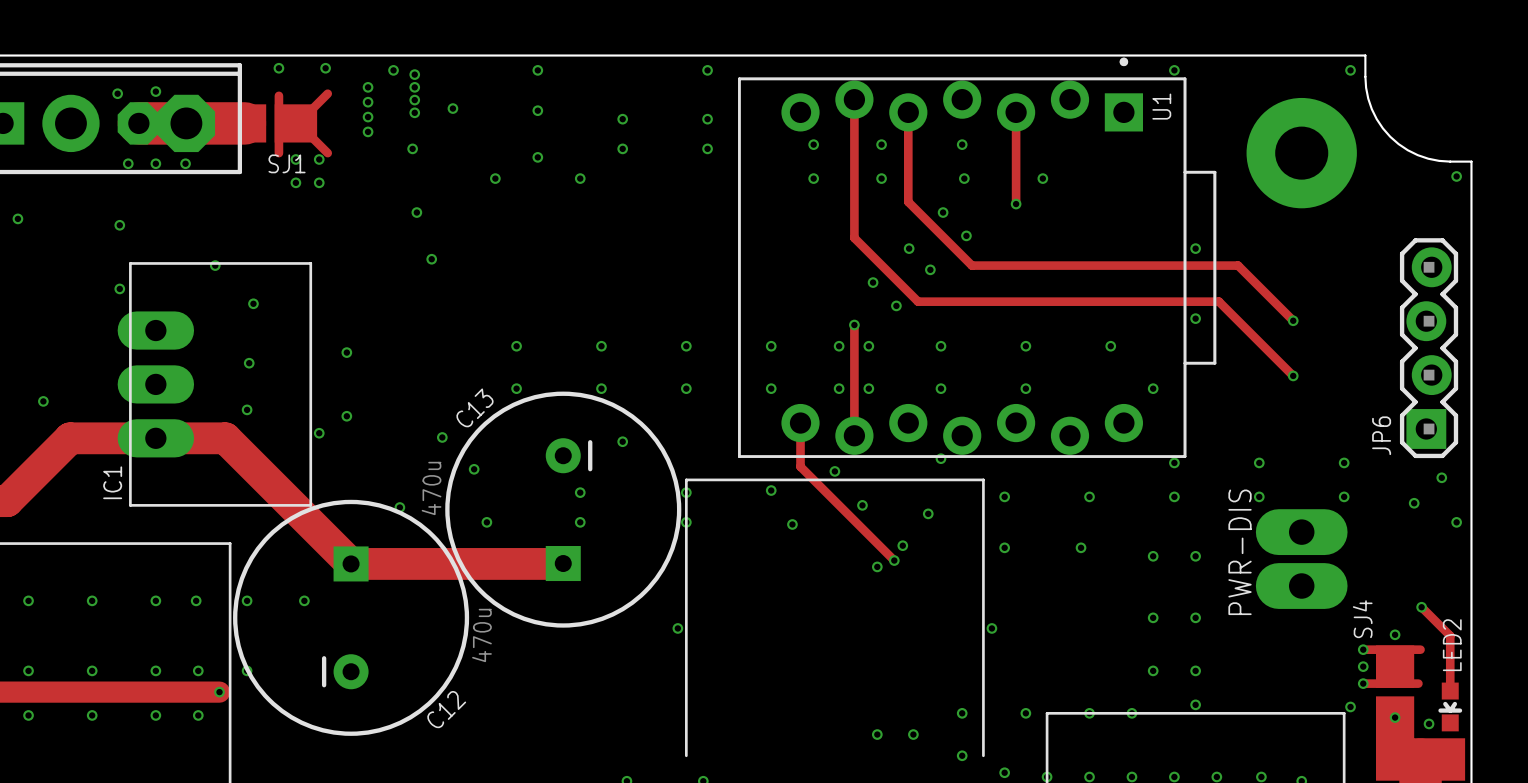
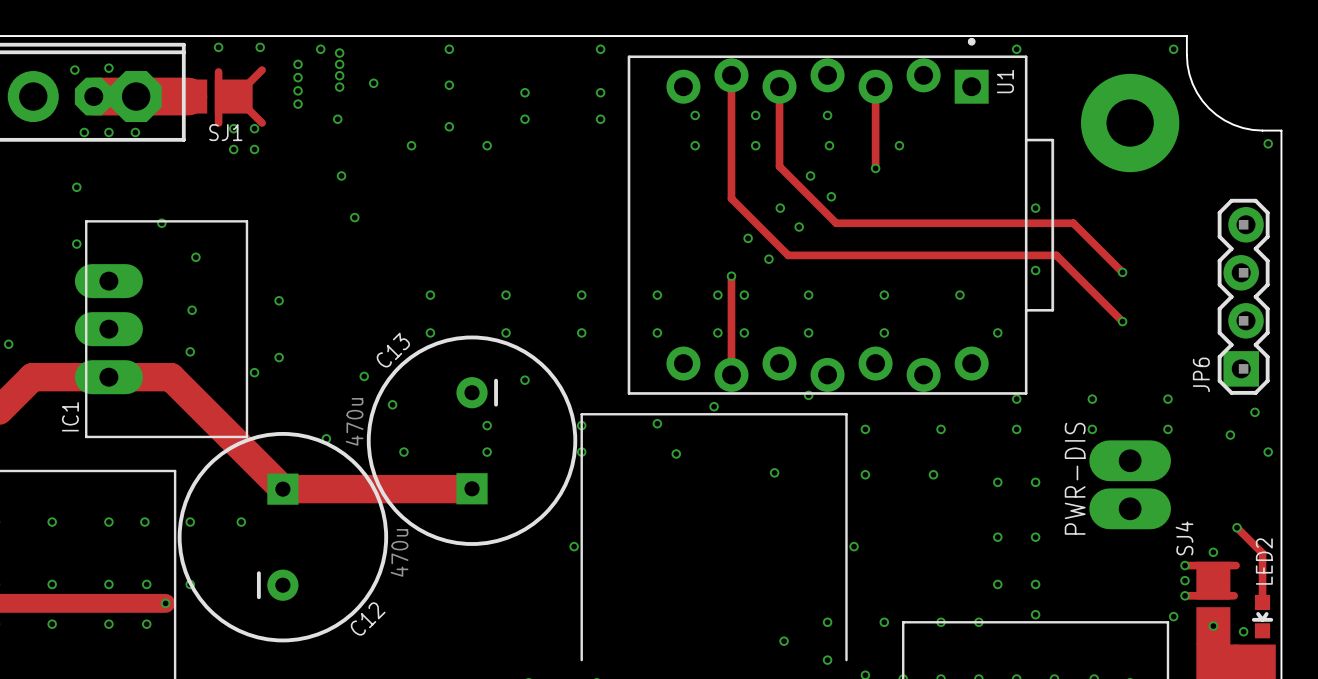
track: (800, 423) (800, 466) (894, 560) -> none
via: (862, 505) -> none
via: (928, 513) -> none
via: (894, 560) -> none
via: (877, 566) -> none
via: (877, 734) -> none

